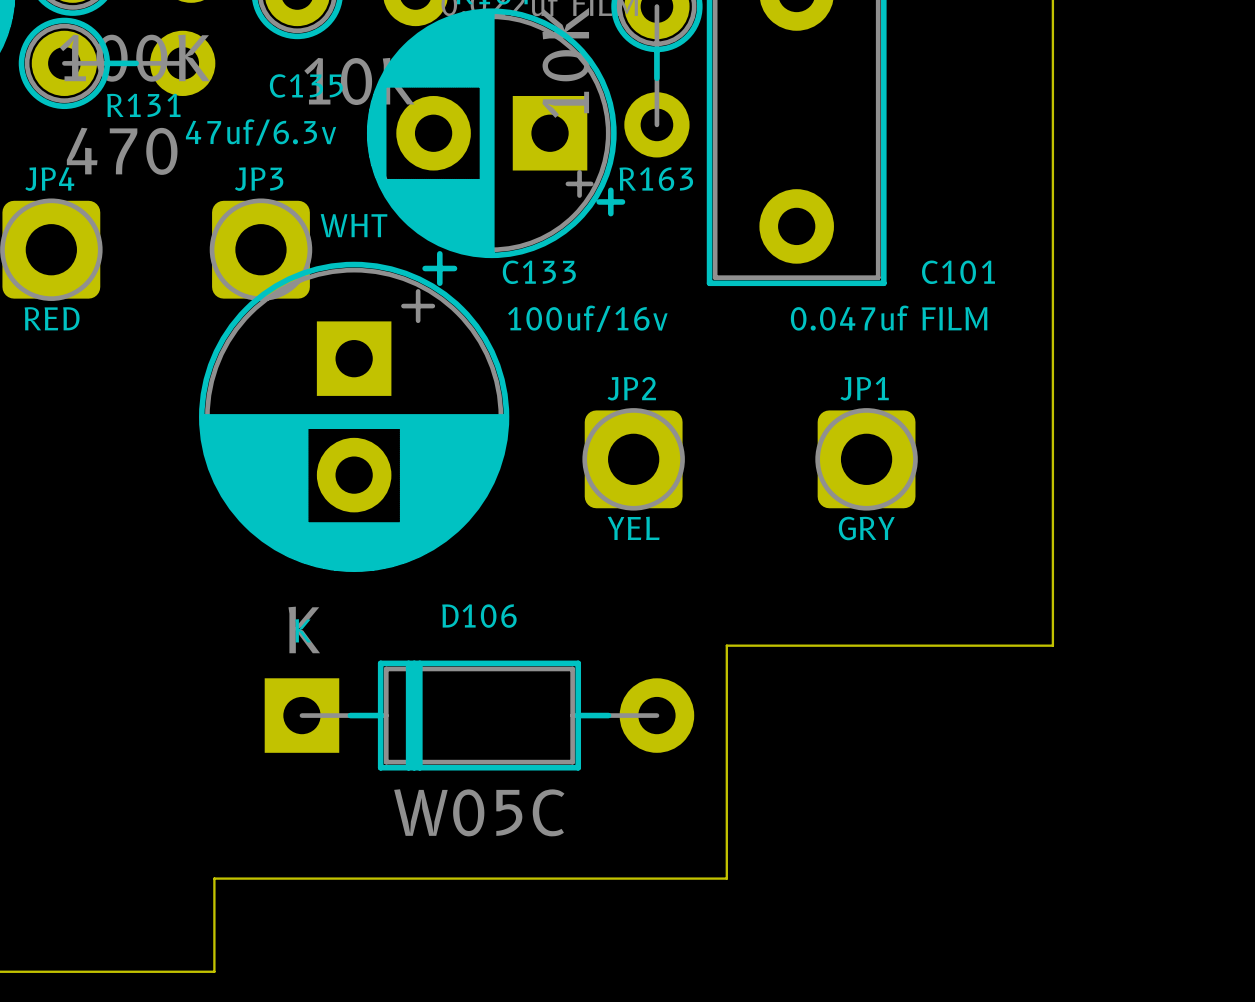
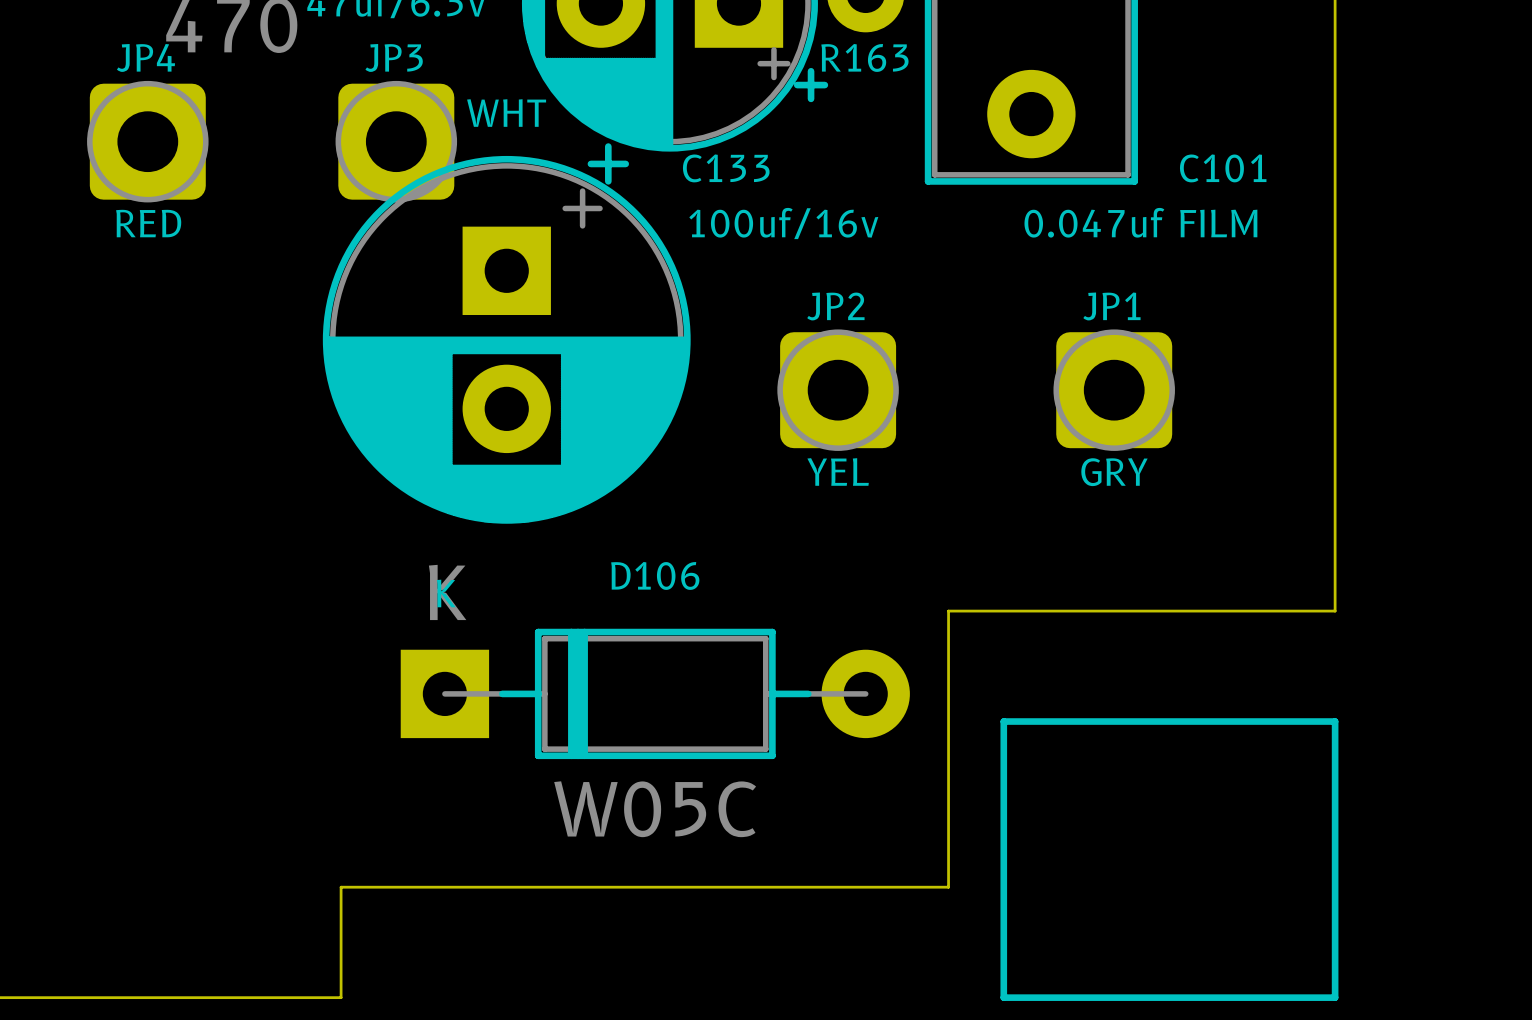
line: none -> (1003, 721) (1335, 721) (1335, 997) (1003, 997) (1003, 721)

